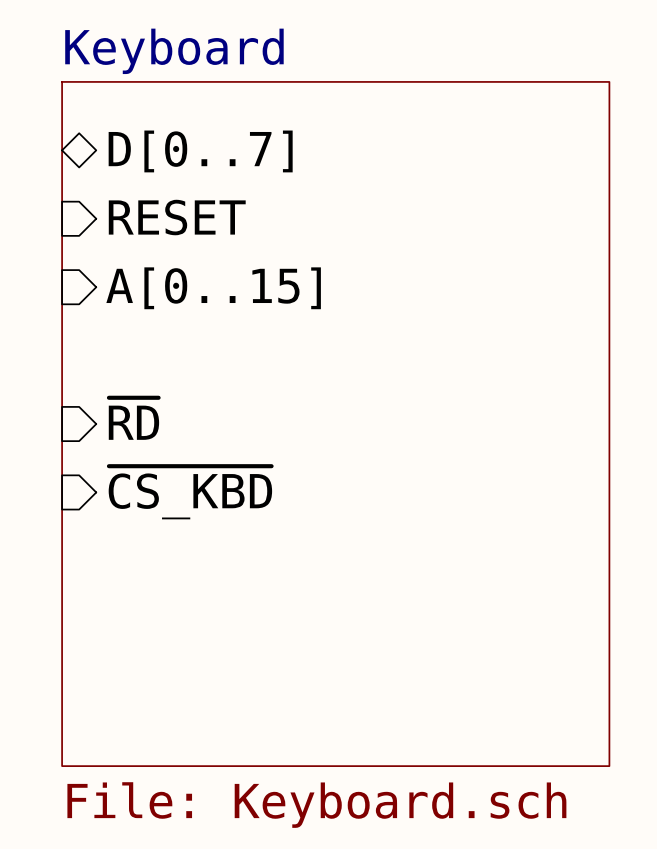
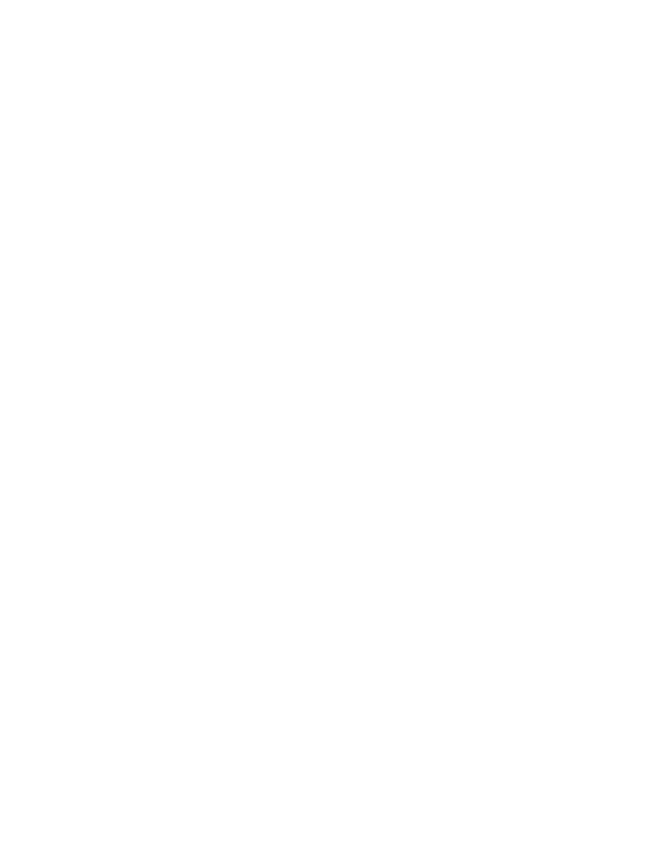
sheet pin: D[0..7] (200, 151) -> none
sheet pin: RESET (177, 217) -> none
sheet pin: A[0..15] (213, 288) -> none
sheet pin: ~{RD} (133, 418) -> none
sheet Keyboard: File: Keyboard.sch (335, 424) -> none
sheet pin: ~{CS_KBD} (190, 492) -> none

